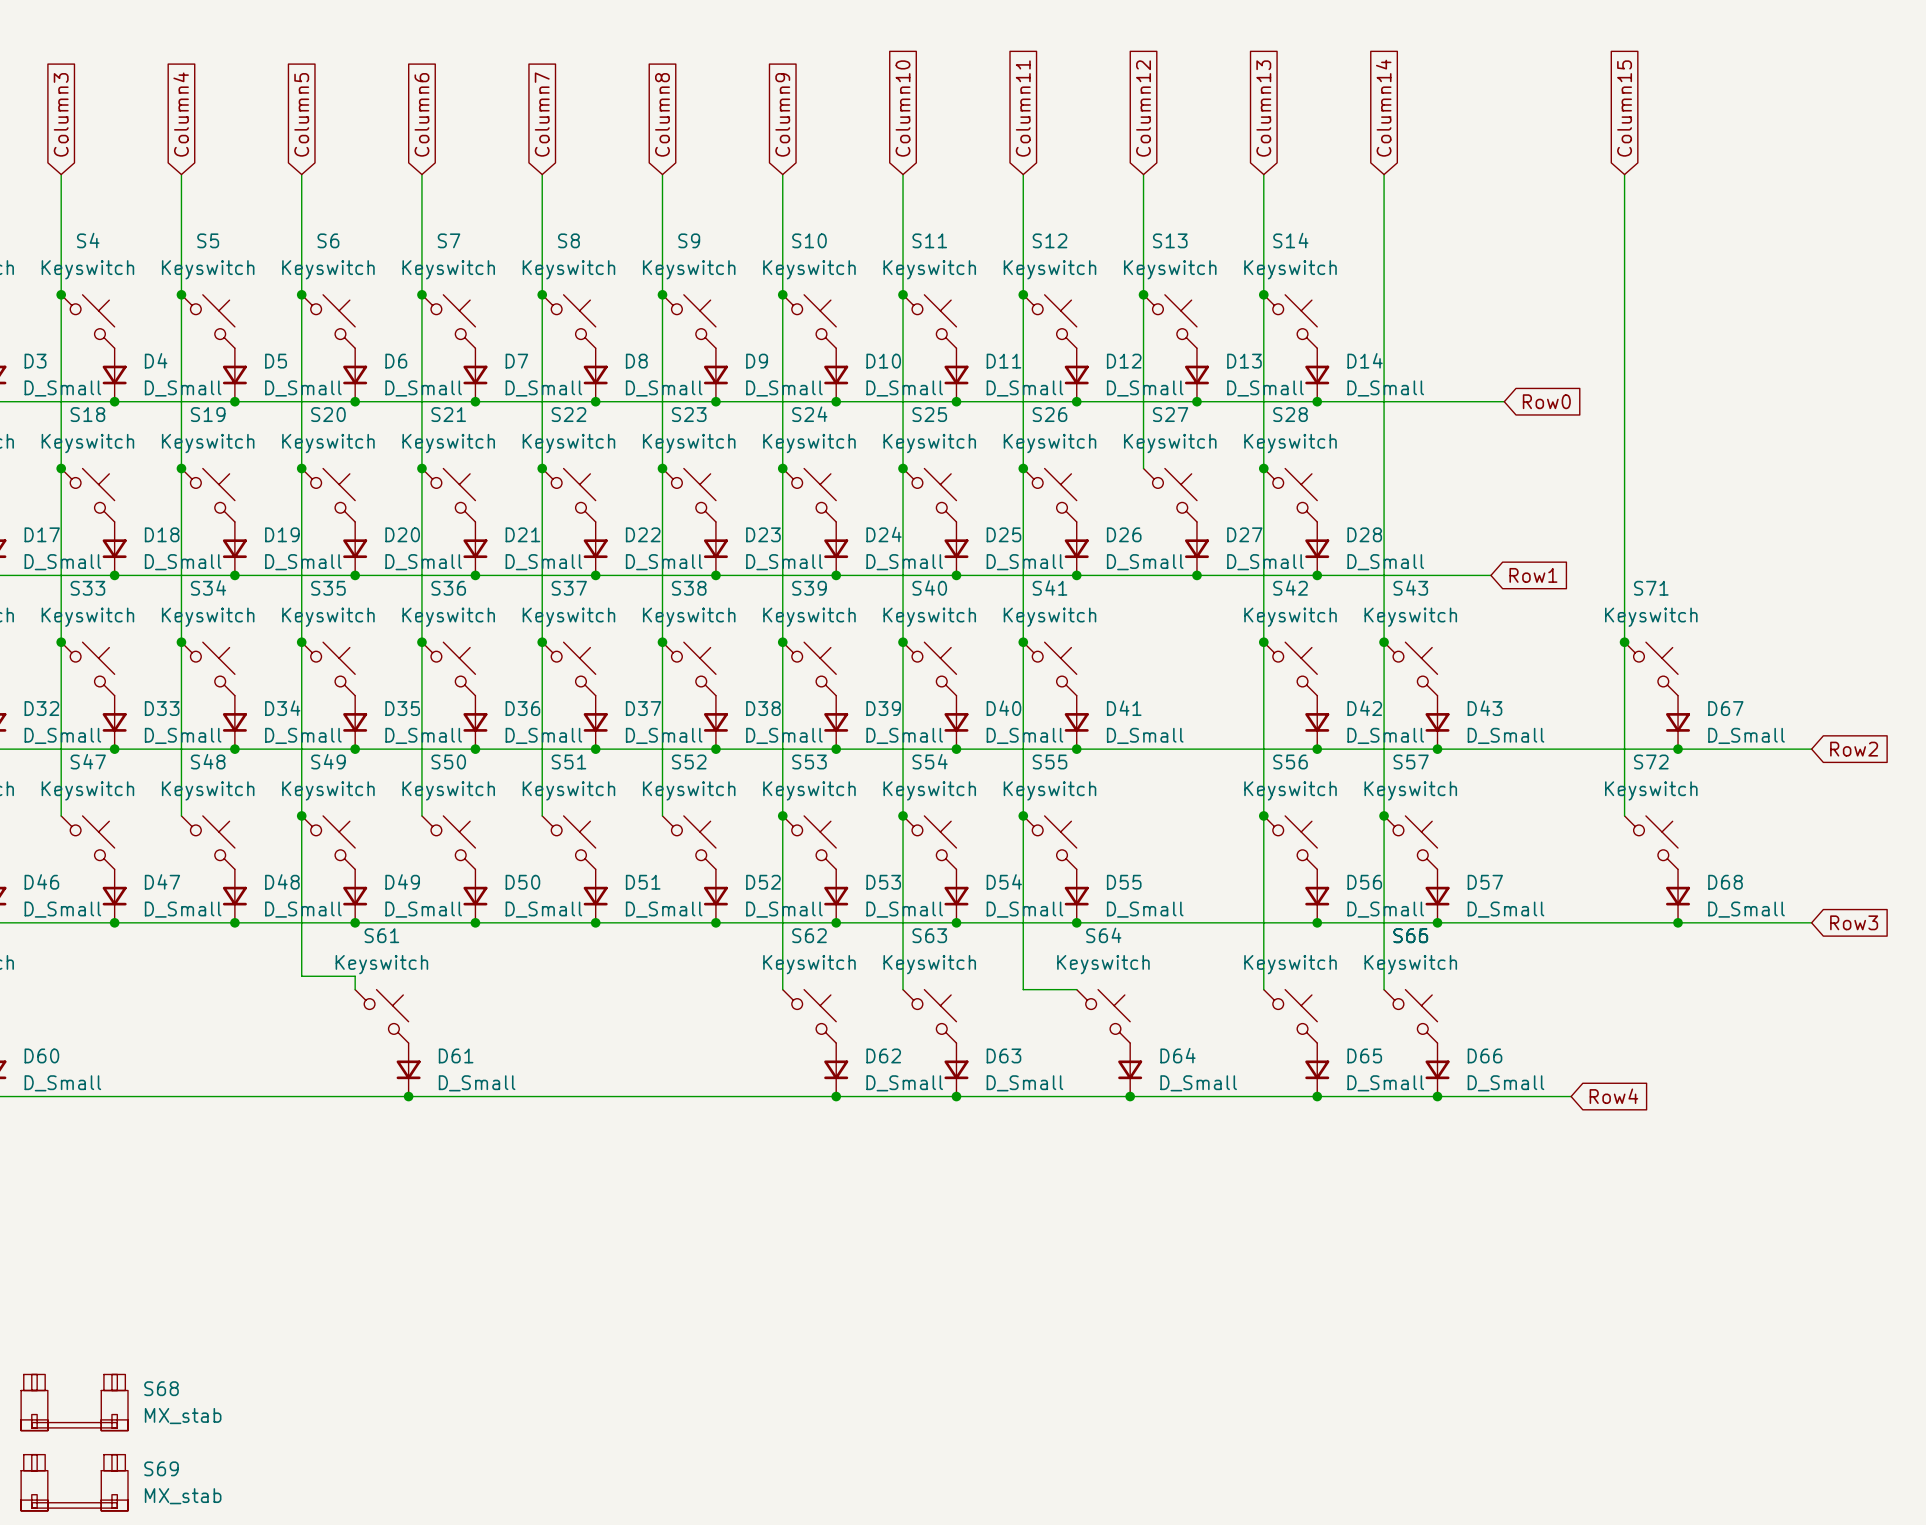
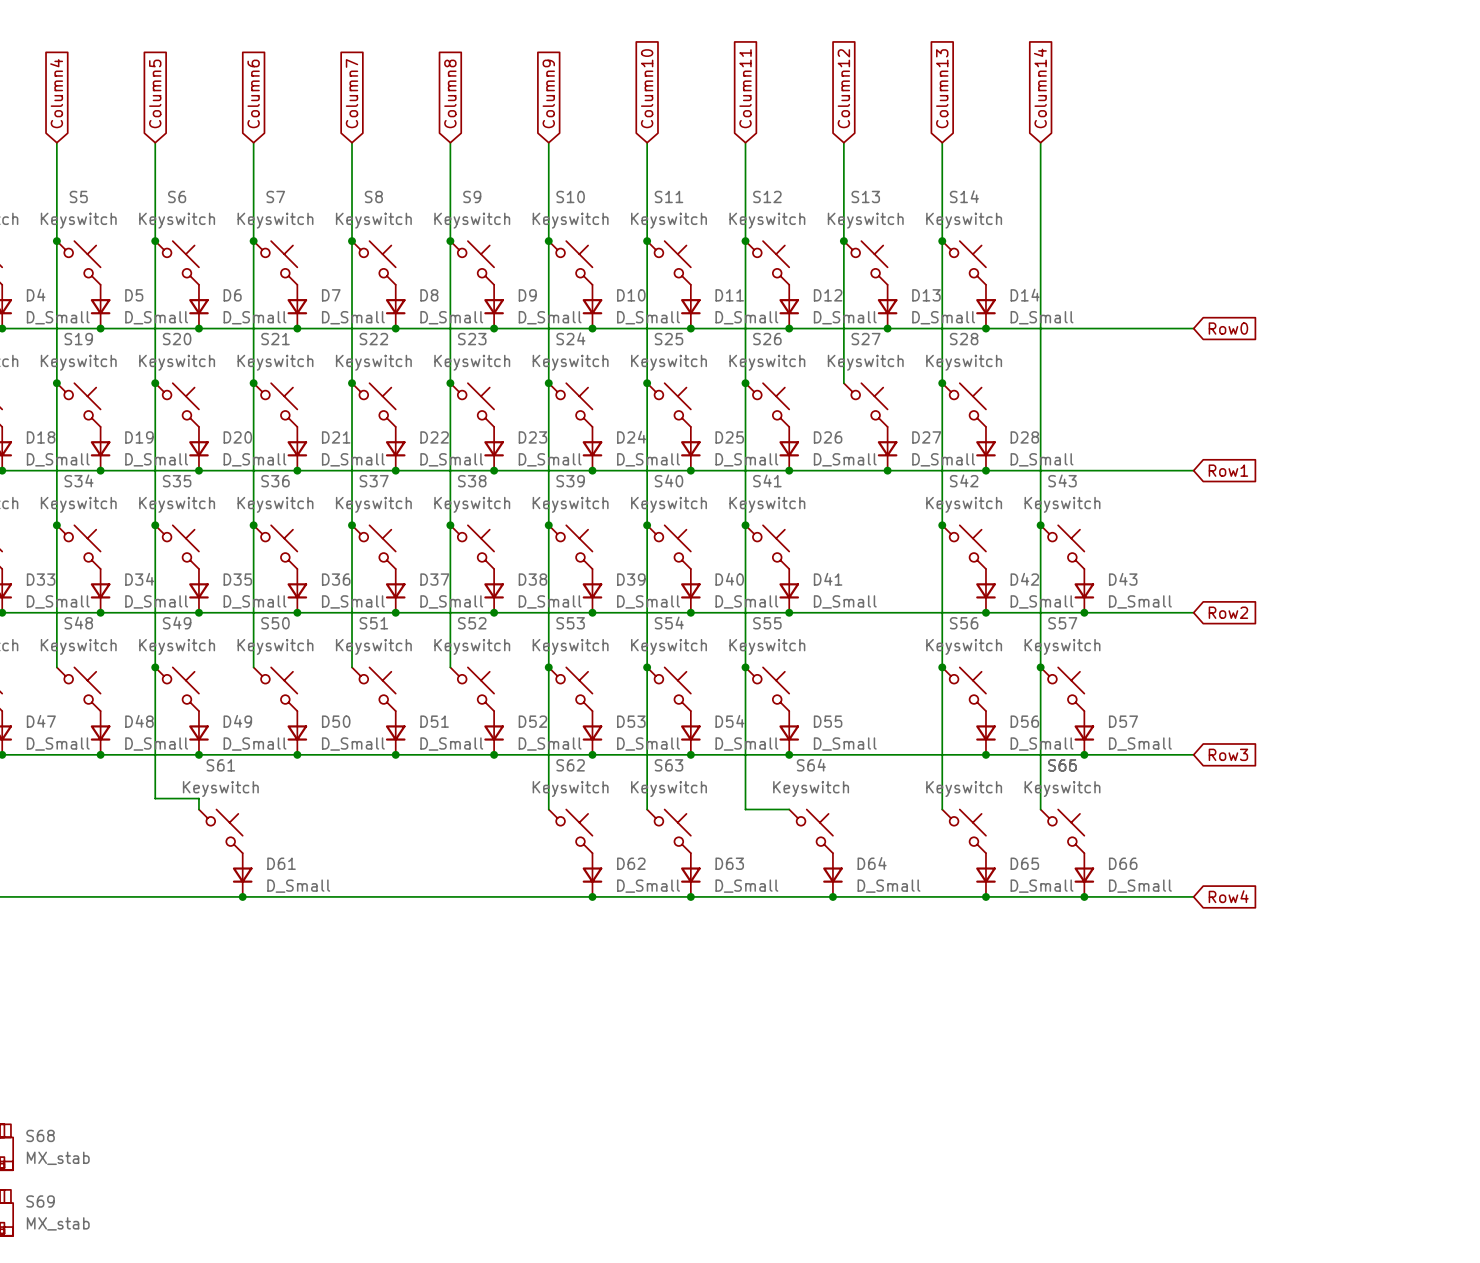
global label: Column15 (1624, 108) -> none
wire: (1624, 174) (1624, 815) -> none
wire: none -> (1139, 328) (1193, 328)
global label position: Row0 (1546, 401) -> Row0 (1228, 328)
wire: none -> (1128, 470) (1193, 470)
global label position: Row1 (1533, 575) -> Row1 (1228, 470)
junction: (1624, 642) -> none
S71: Keyswitch (1651, 668) -> none
D67: D_Small (1678, 722) -> none
wire: (1571, 749) (1811, 749) -> none
junction: (1678, 749) -> none
global label position: Row2 (1854, 749) -> Row2 (1228, 612)
S72: Keyswitch (1651, 842) -> none
D68: D_Small (1678, 896) -> none
wire: (1571, 922) (1811, 922) -> none
junction: (1678, 922) -> none
global label position: Row3 (1854, 922) -> Row3 (1228, 754)

